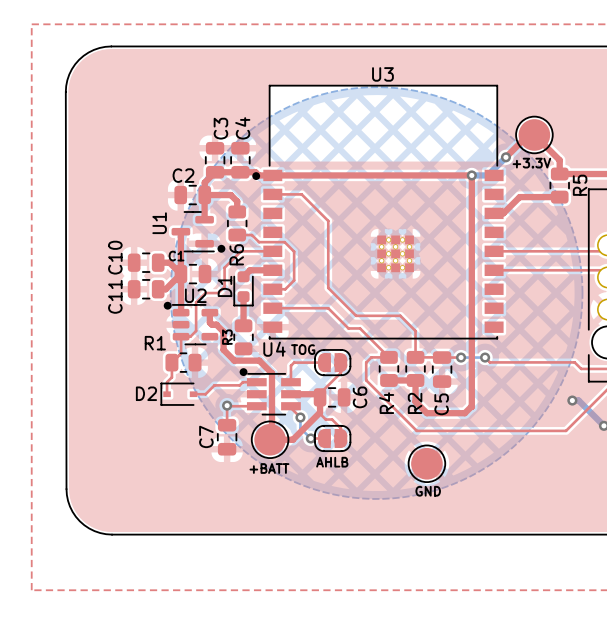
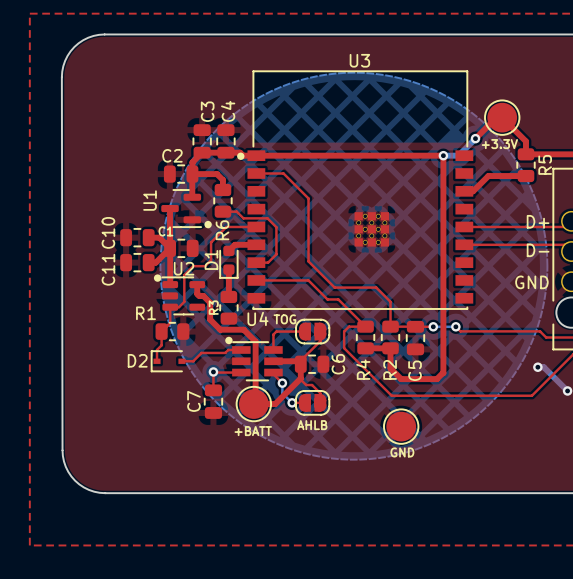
text: none -> D+ (538, 221)
text: none -> D- (538, 250)
text: none -> GND (531, 282)

